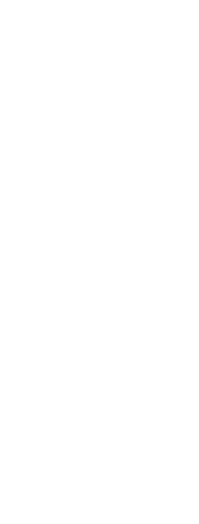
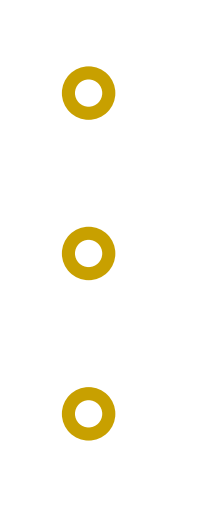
part: none -> (88, 93)
part: none -> (88, 253)
part: none -> (88, 413)

